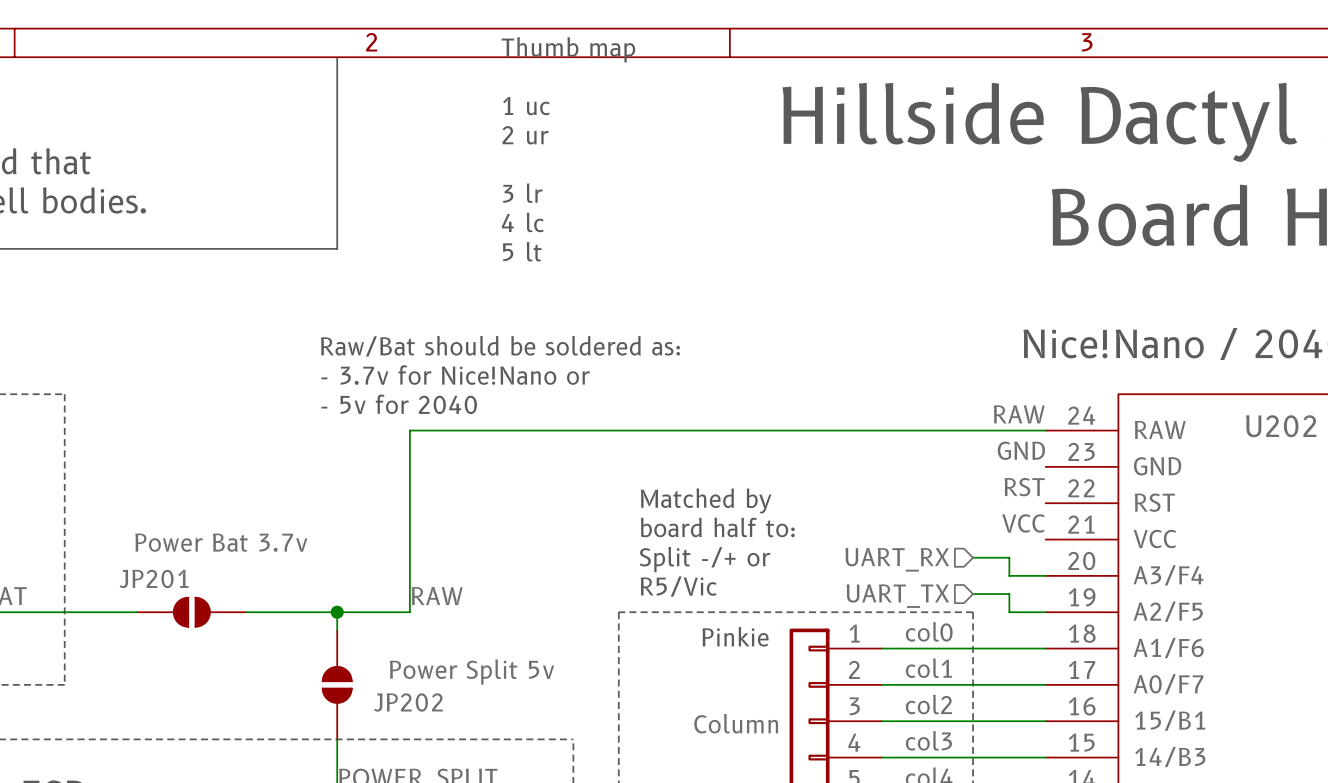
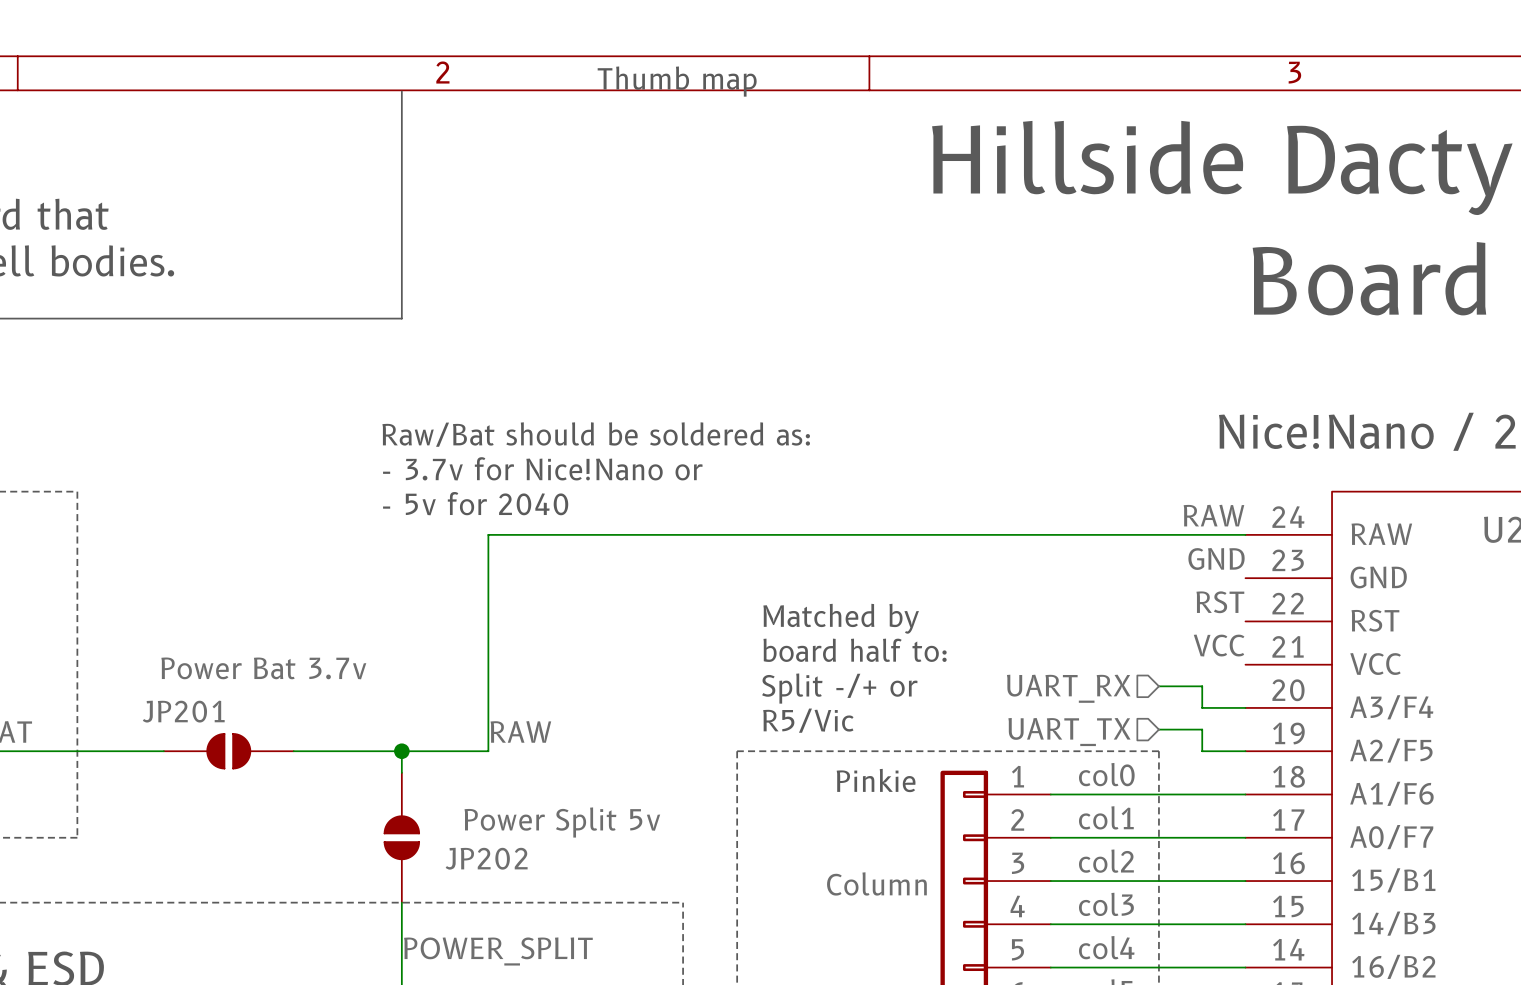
text: 1 uc (526, 106) -> none
text: 2 ur (525, 135) -> none
text: 3 lr (522, 193) -> none
text: 4 lc (522, 222) -> none
text: 5 lt (522, 251) -> none

